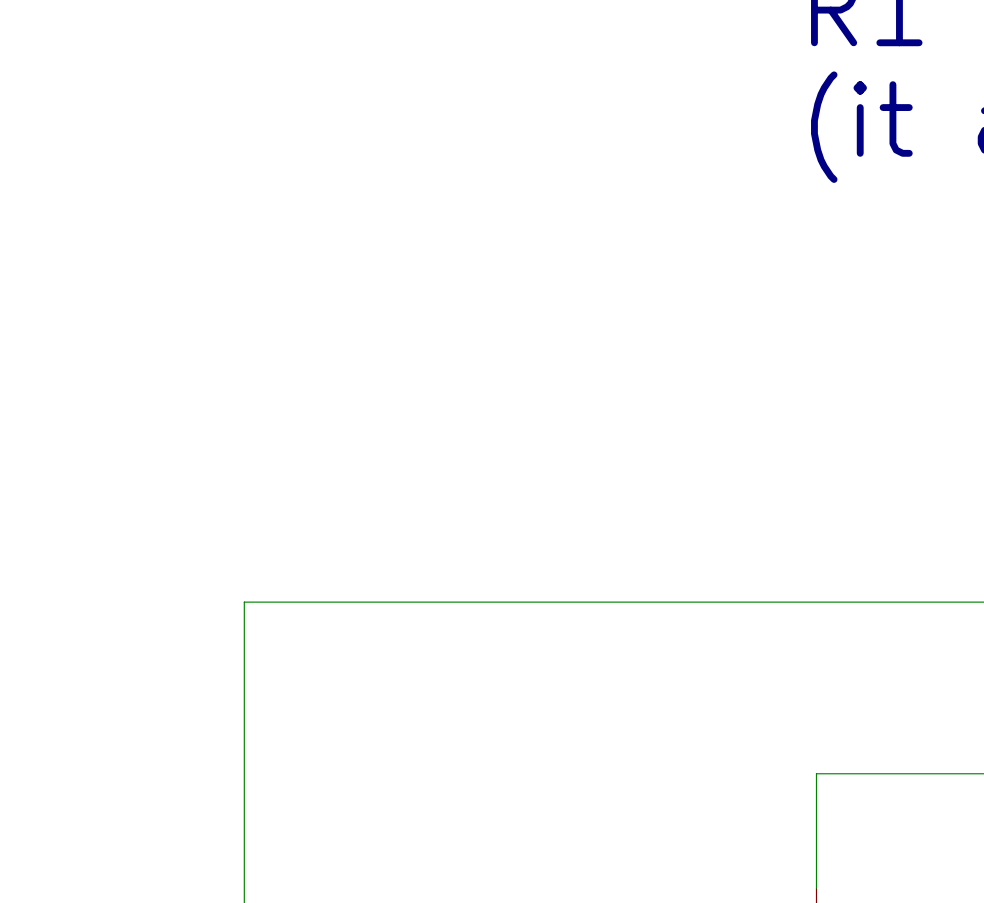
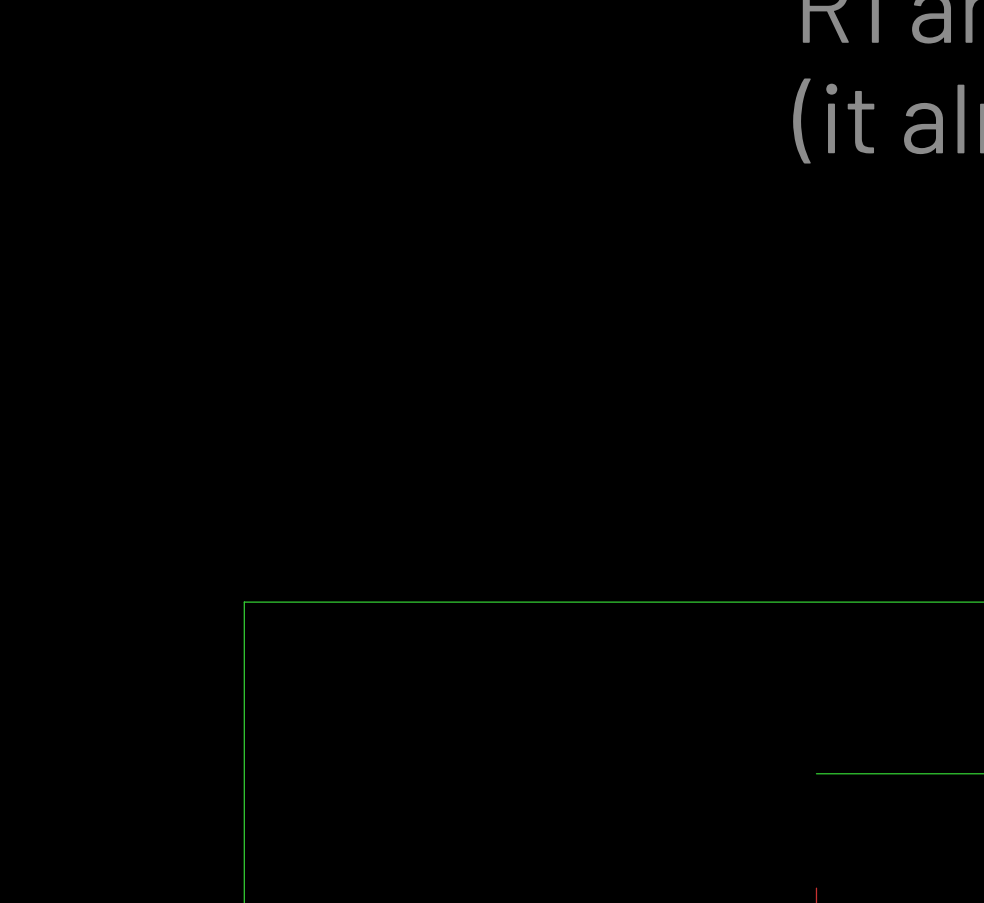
wire: (816, 773) (816, 888) -> none

